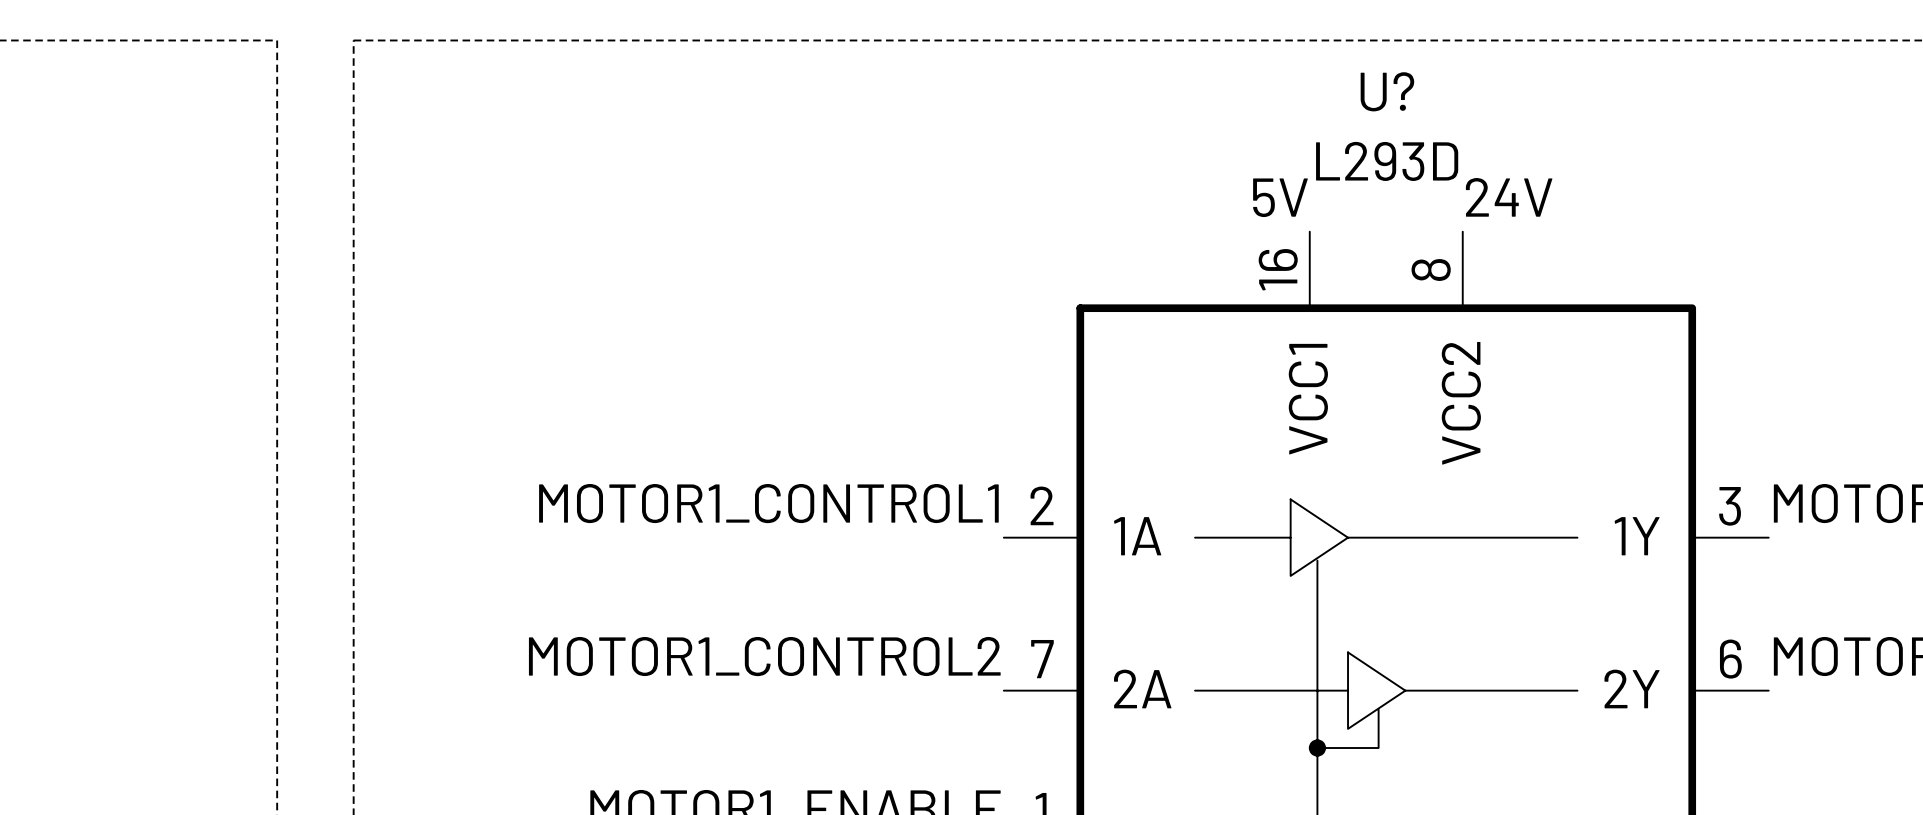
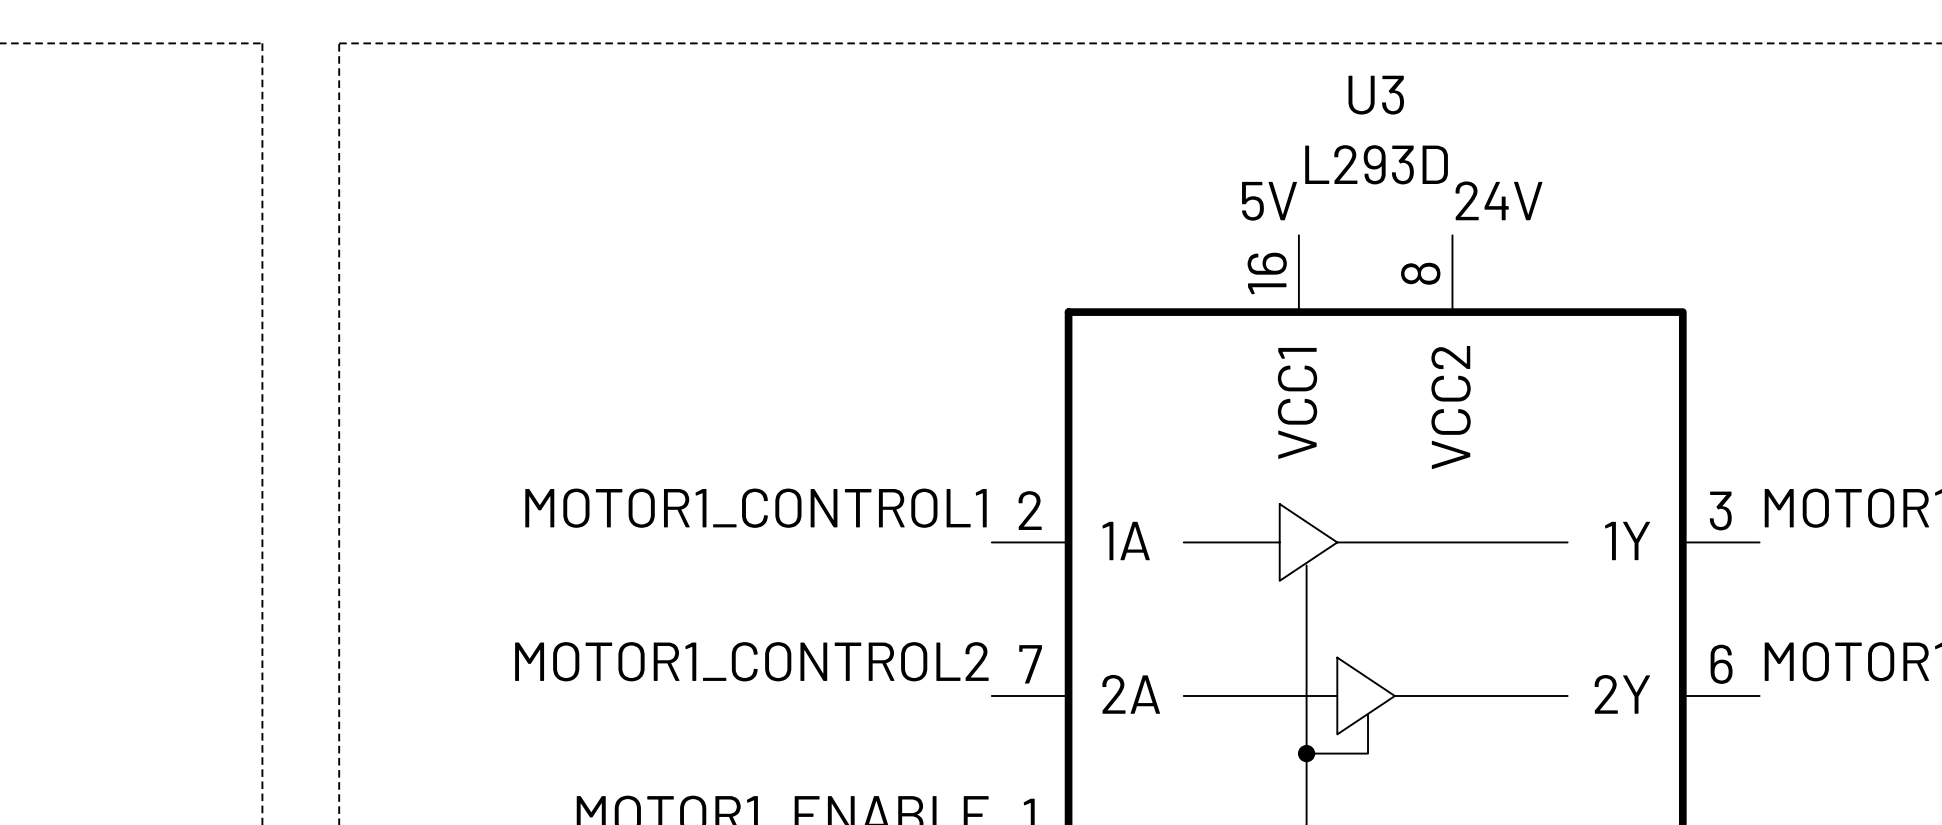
U? name: U? (1387, 91) -> U3 (1376, 95)

